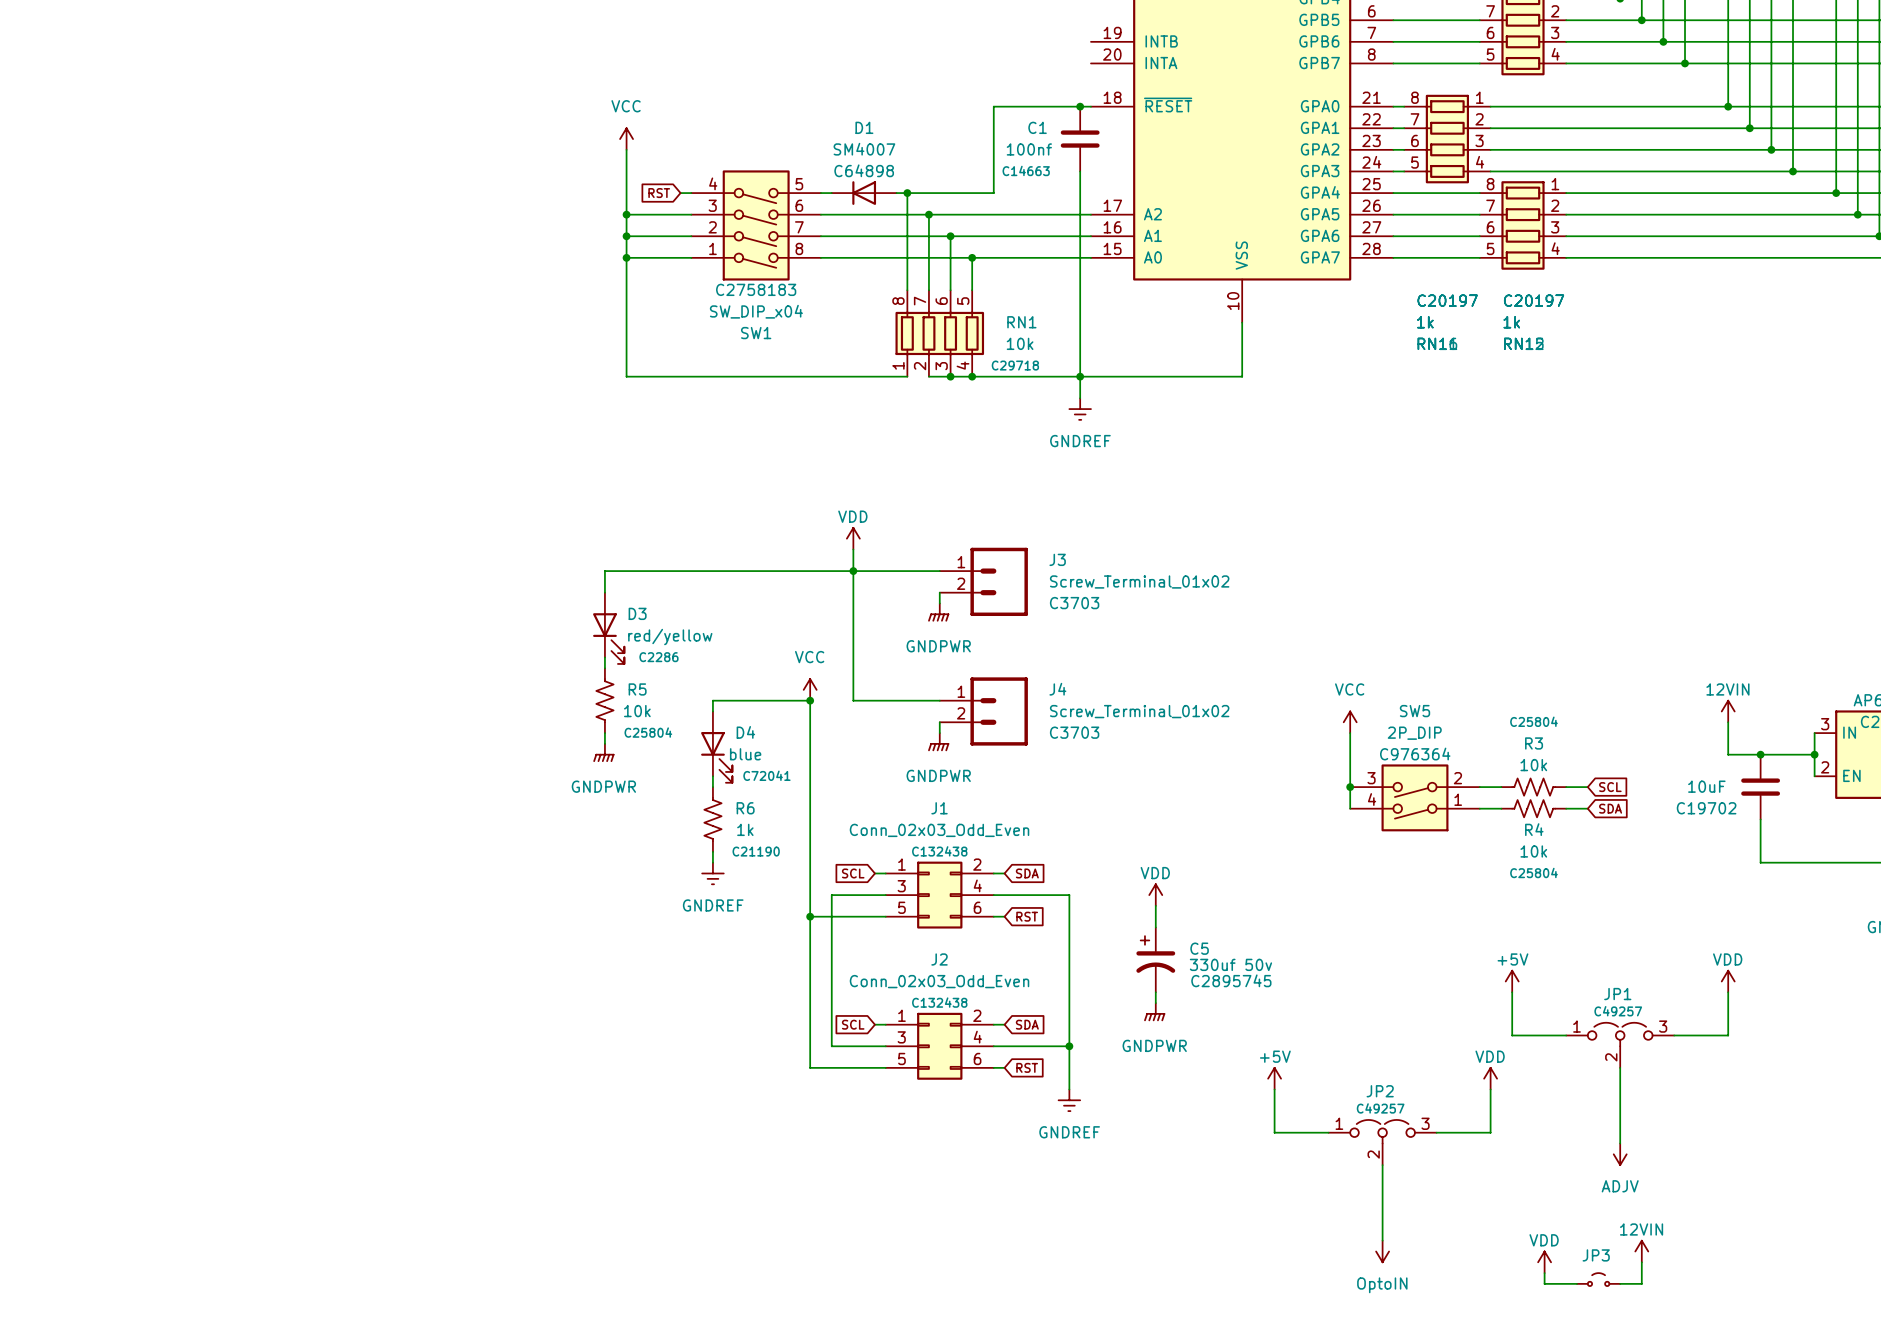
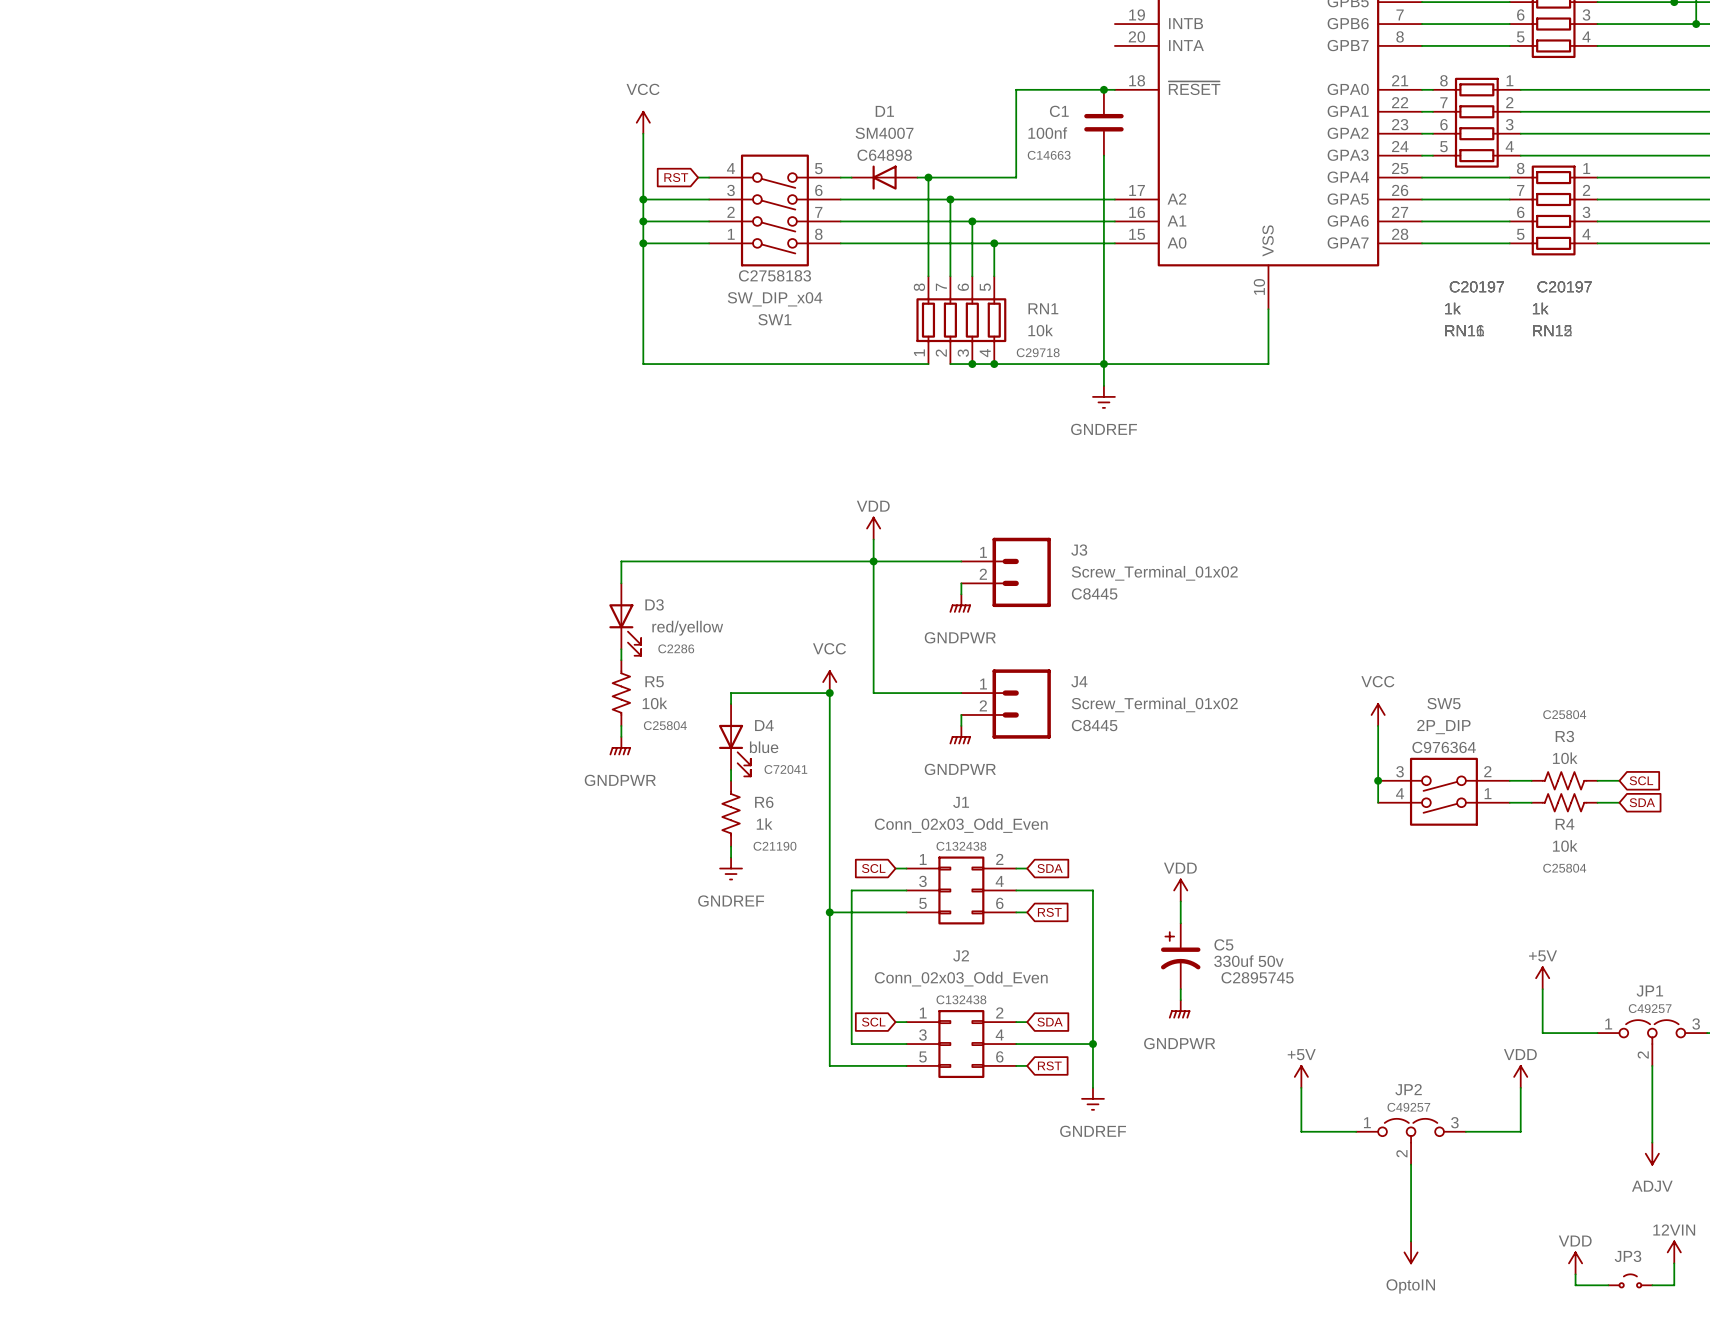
J3 text: C3703 (1074, 603) -> C8445 (1094, 593)
J4 text: C3703 (1074, 732) -> C8445 (1094, 725)

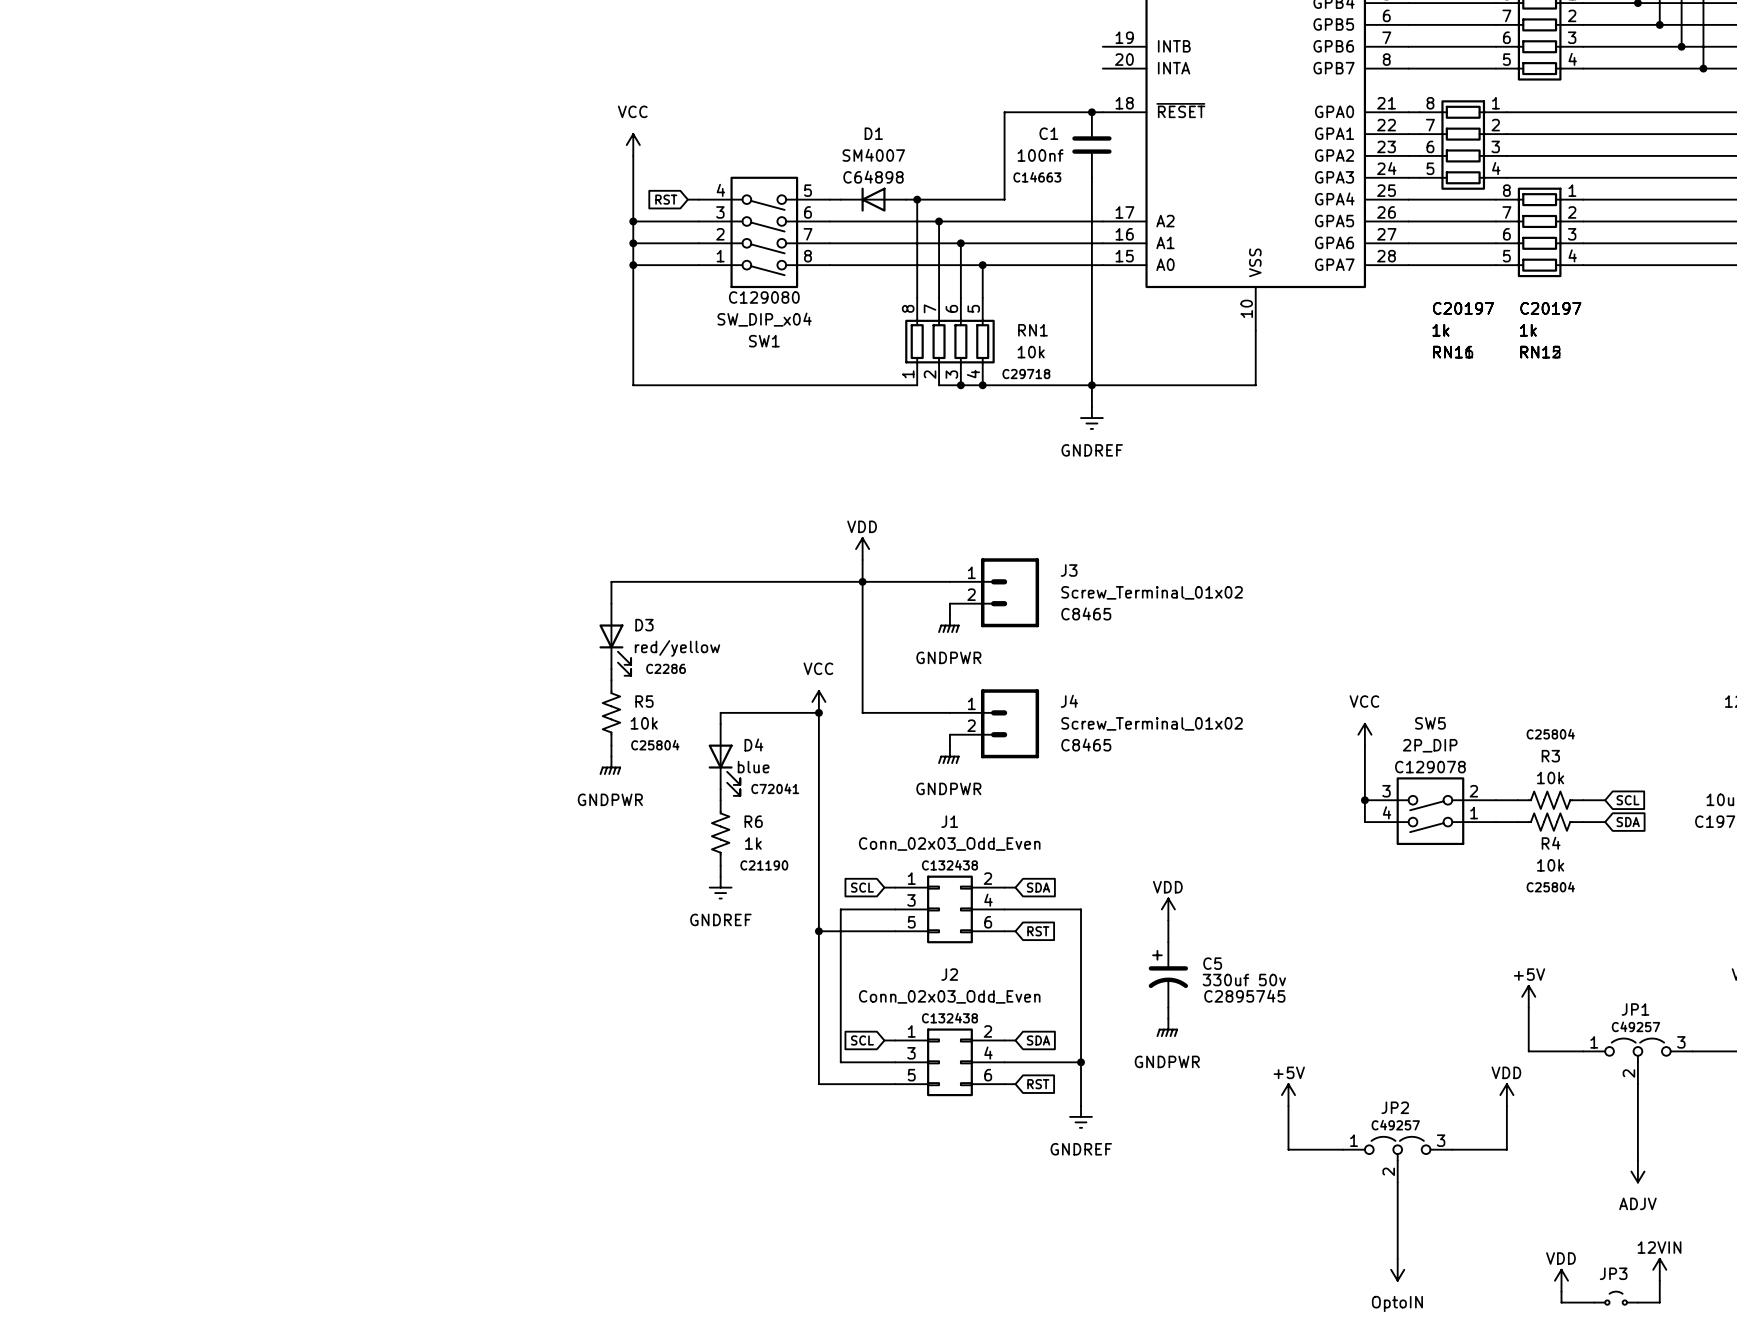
SW1 text: C2758183 (774, 275) -> C129080 (764, 297)
J3 text: C8445 (1094, 593) -> C8465 (1086, 613)
J4 text: C8445 (1094, 725) -> C8465 (1086, 744)
SW5 text: C976364 (1444, 747) -> C129078 (1430, 767)

